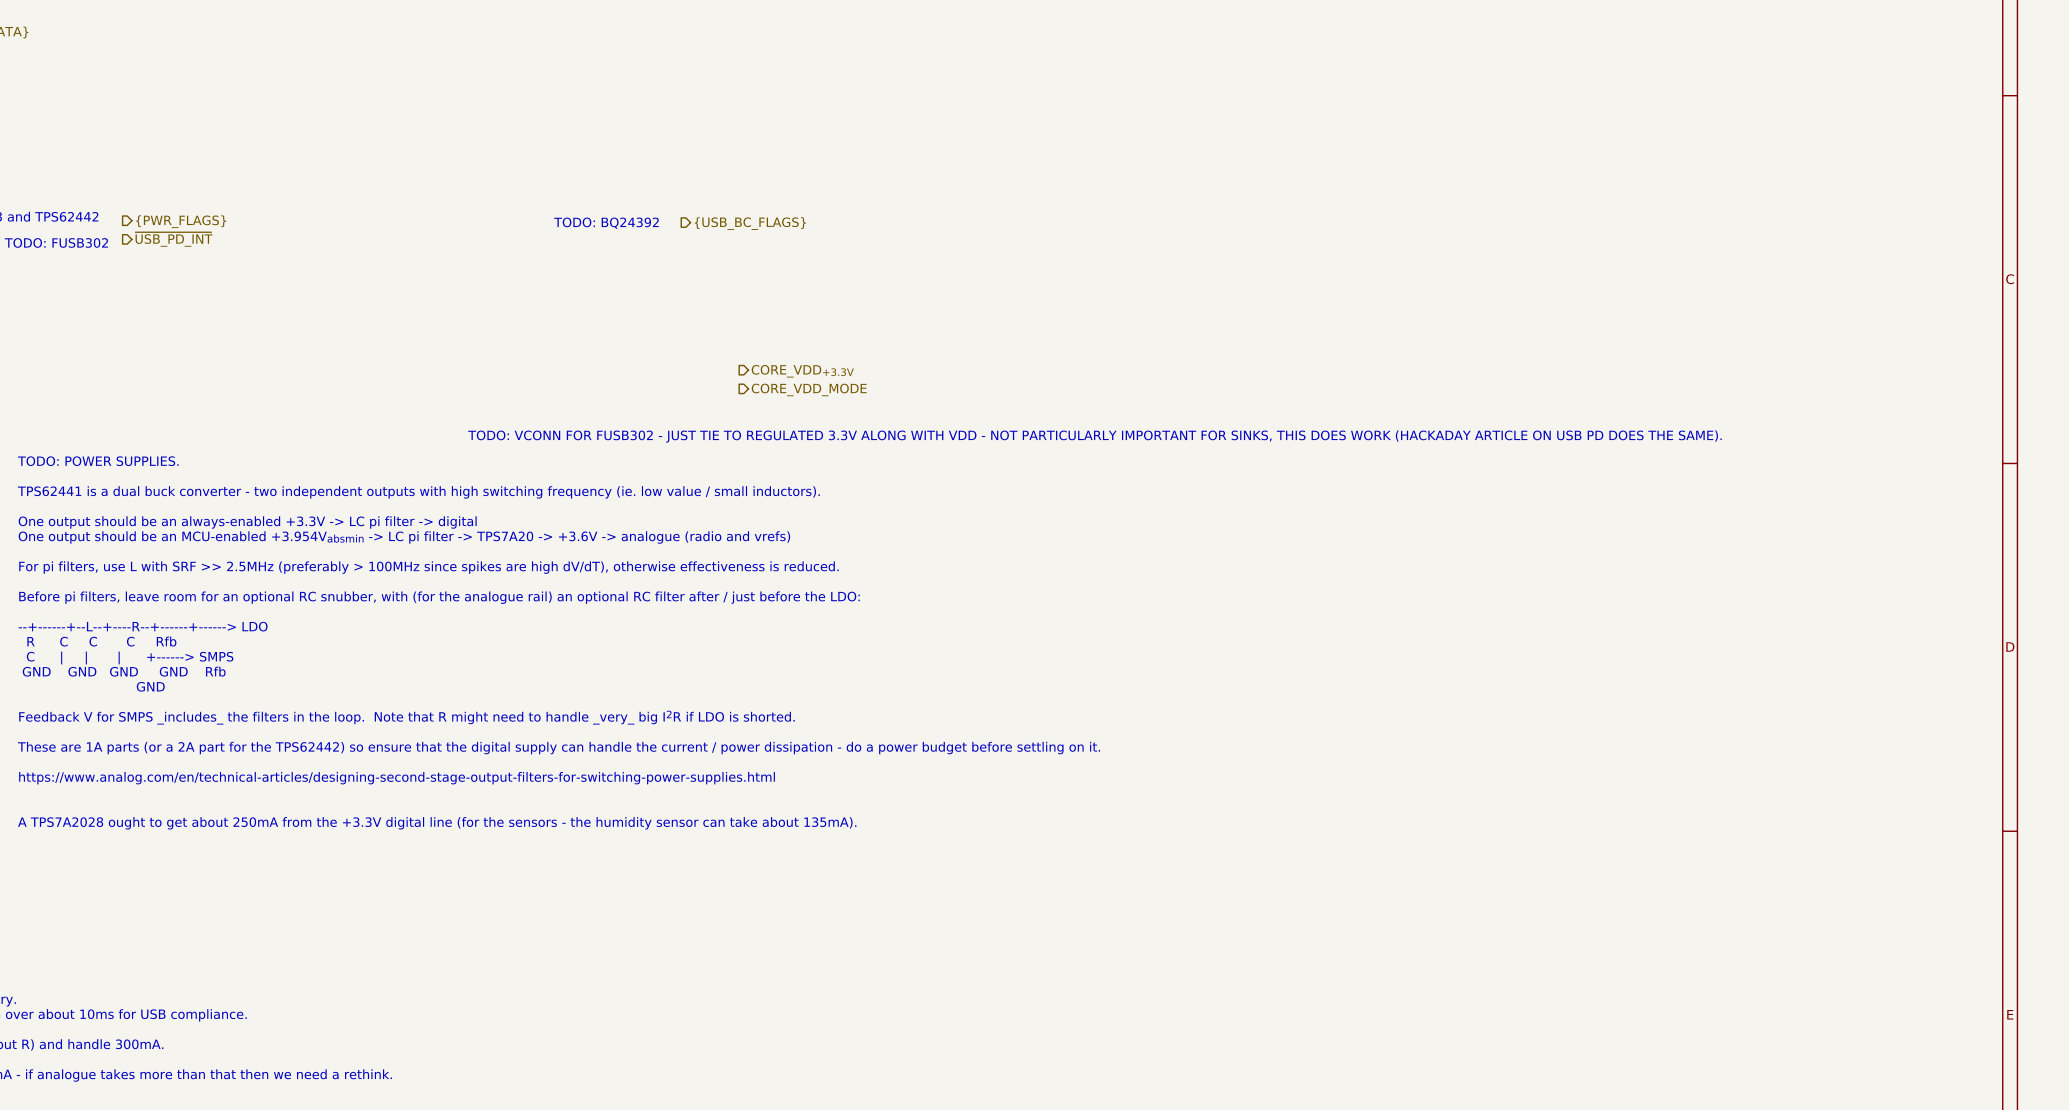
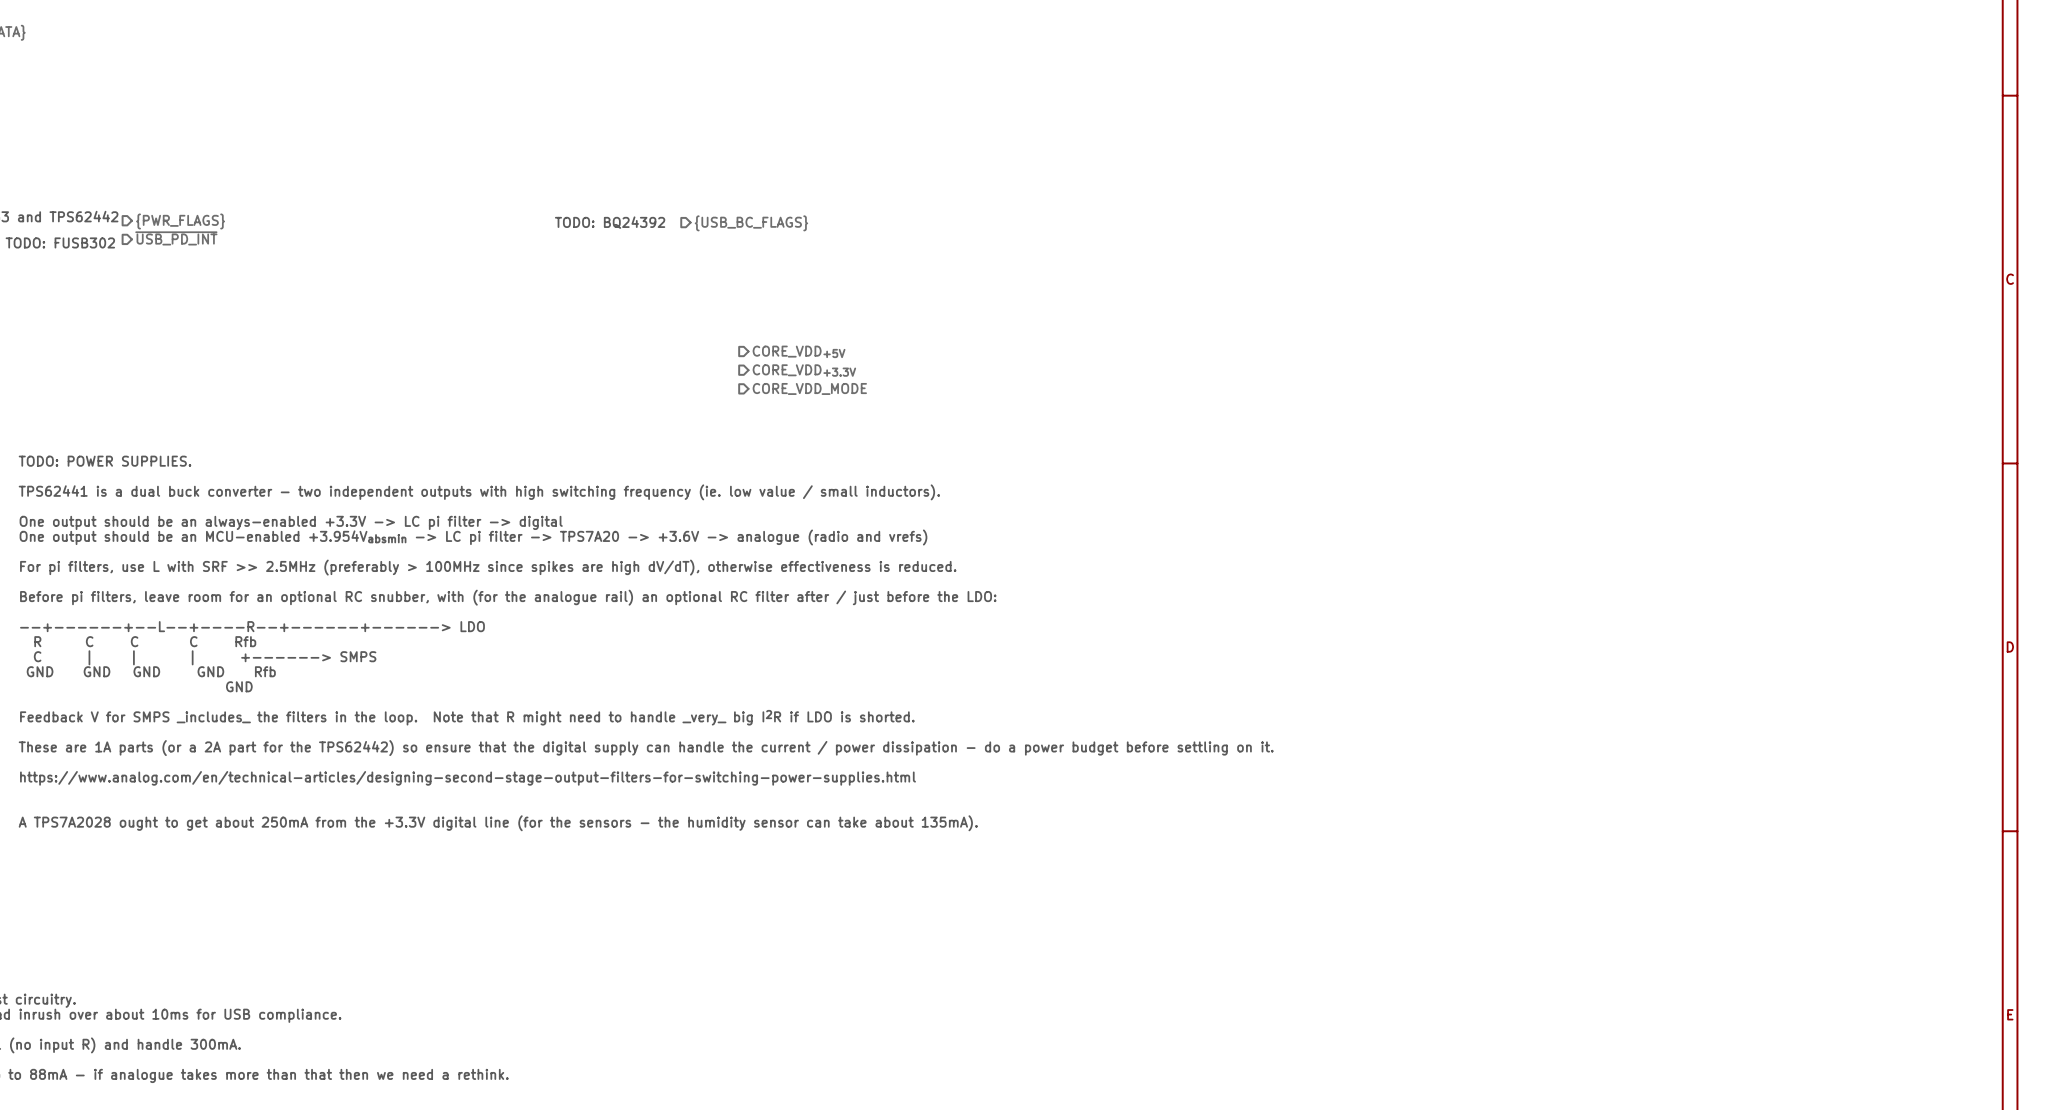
hierarchical label: none -> CORE_VDD+5V (799, 351)
text: TODO: VCONN FOR FUSB302 - JUST TIE TO REGULATED 3.3V ALONG WITH VDD - NOT PARTICULARLY IMPORTANT FOR SINKS, THIS DOES WORK (HACKADAY ARTICLE ON USB PD DOES THE SAME). (1094, 436) -> none

